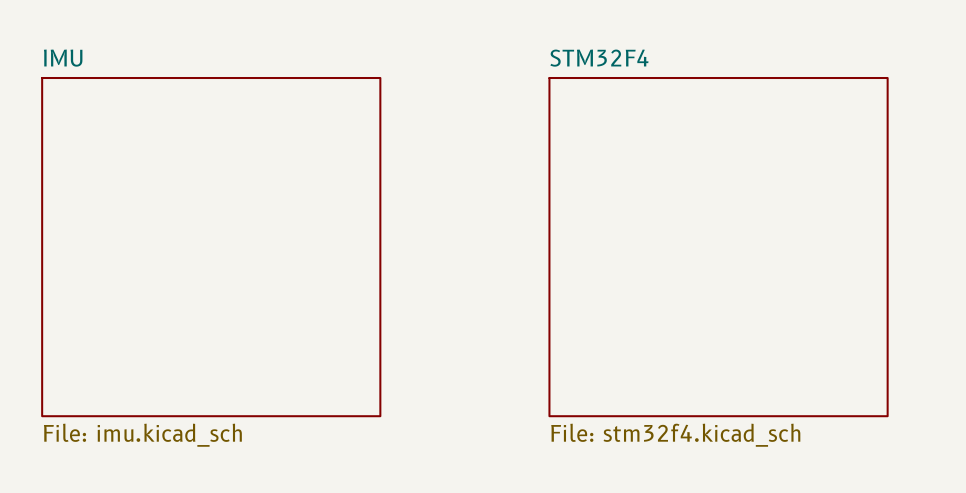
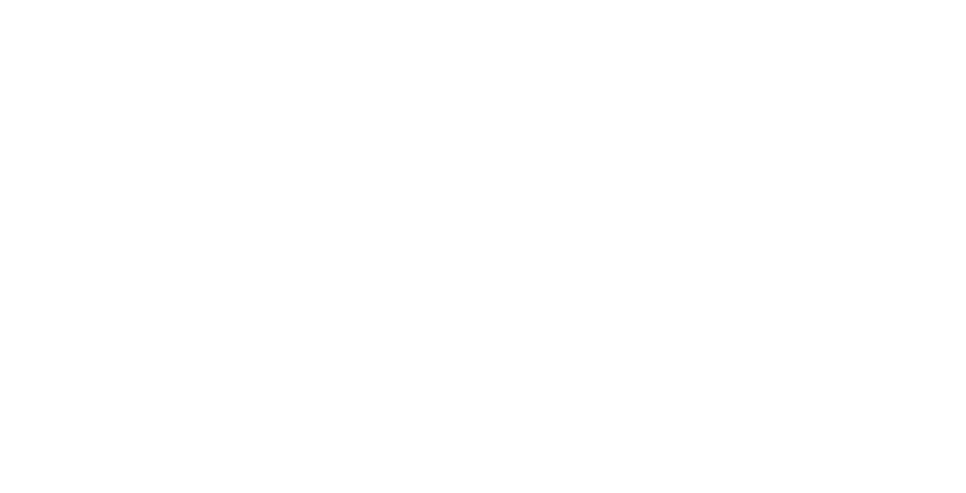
sheet IMU: File: imu.kicad_sch (211, 247) -> none
sheet STM32F4: File: stm32f4.kicad_sch (718, 247) -> none

